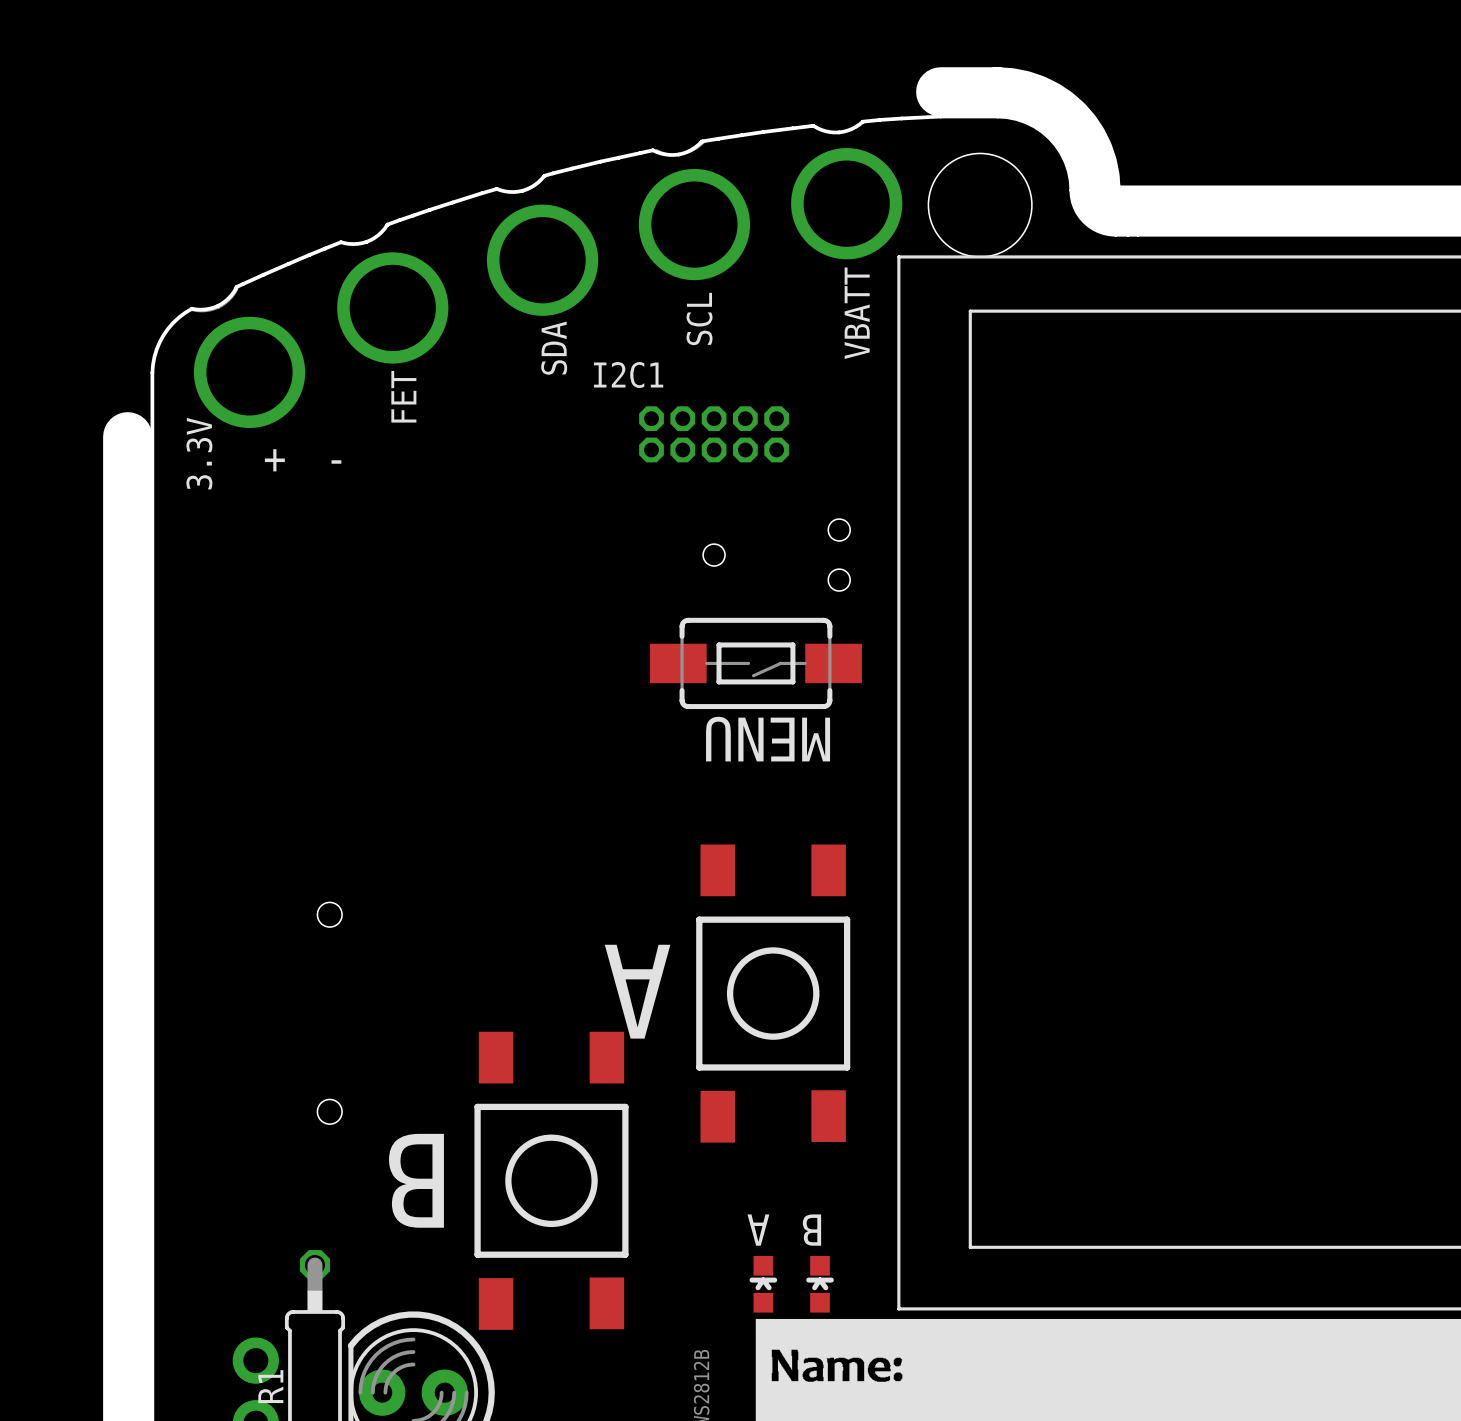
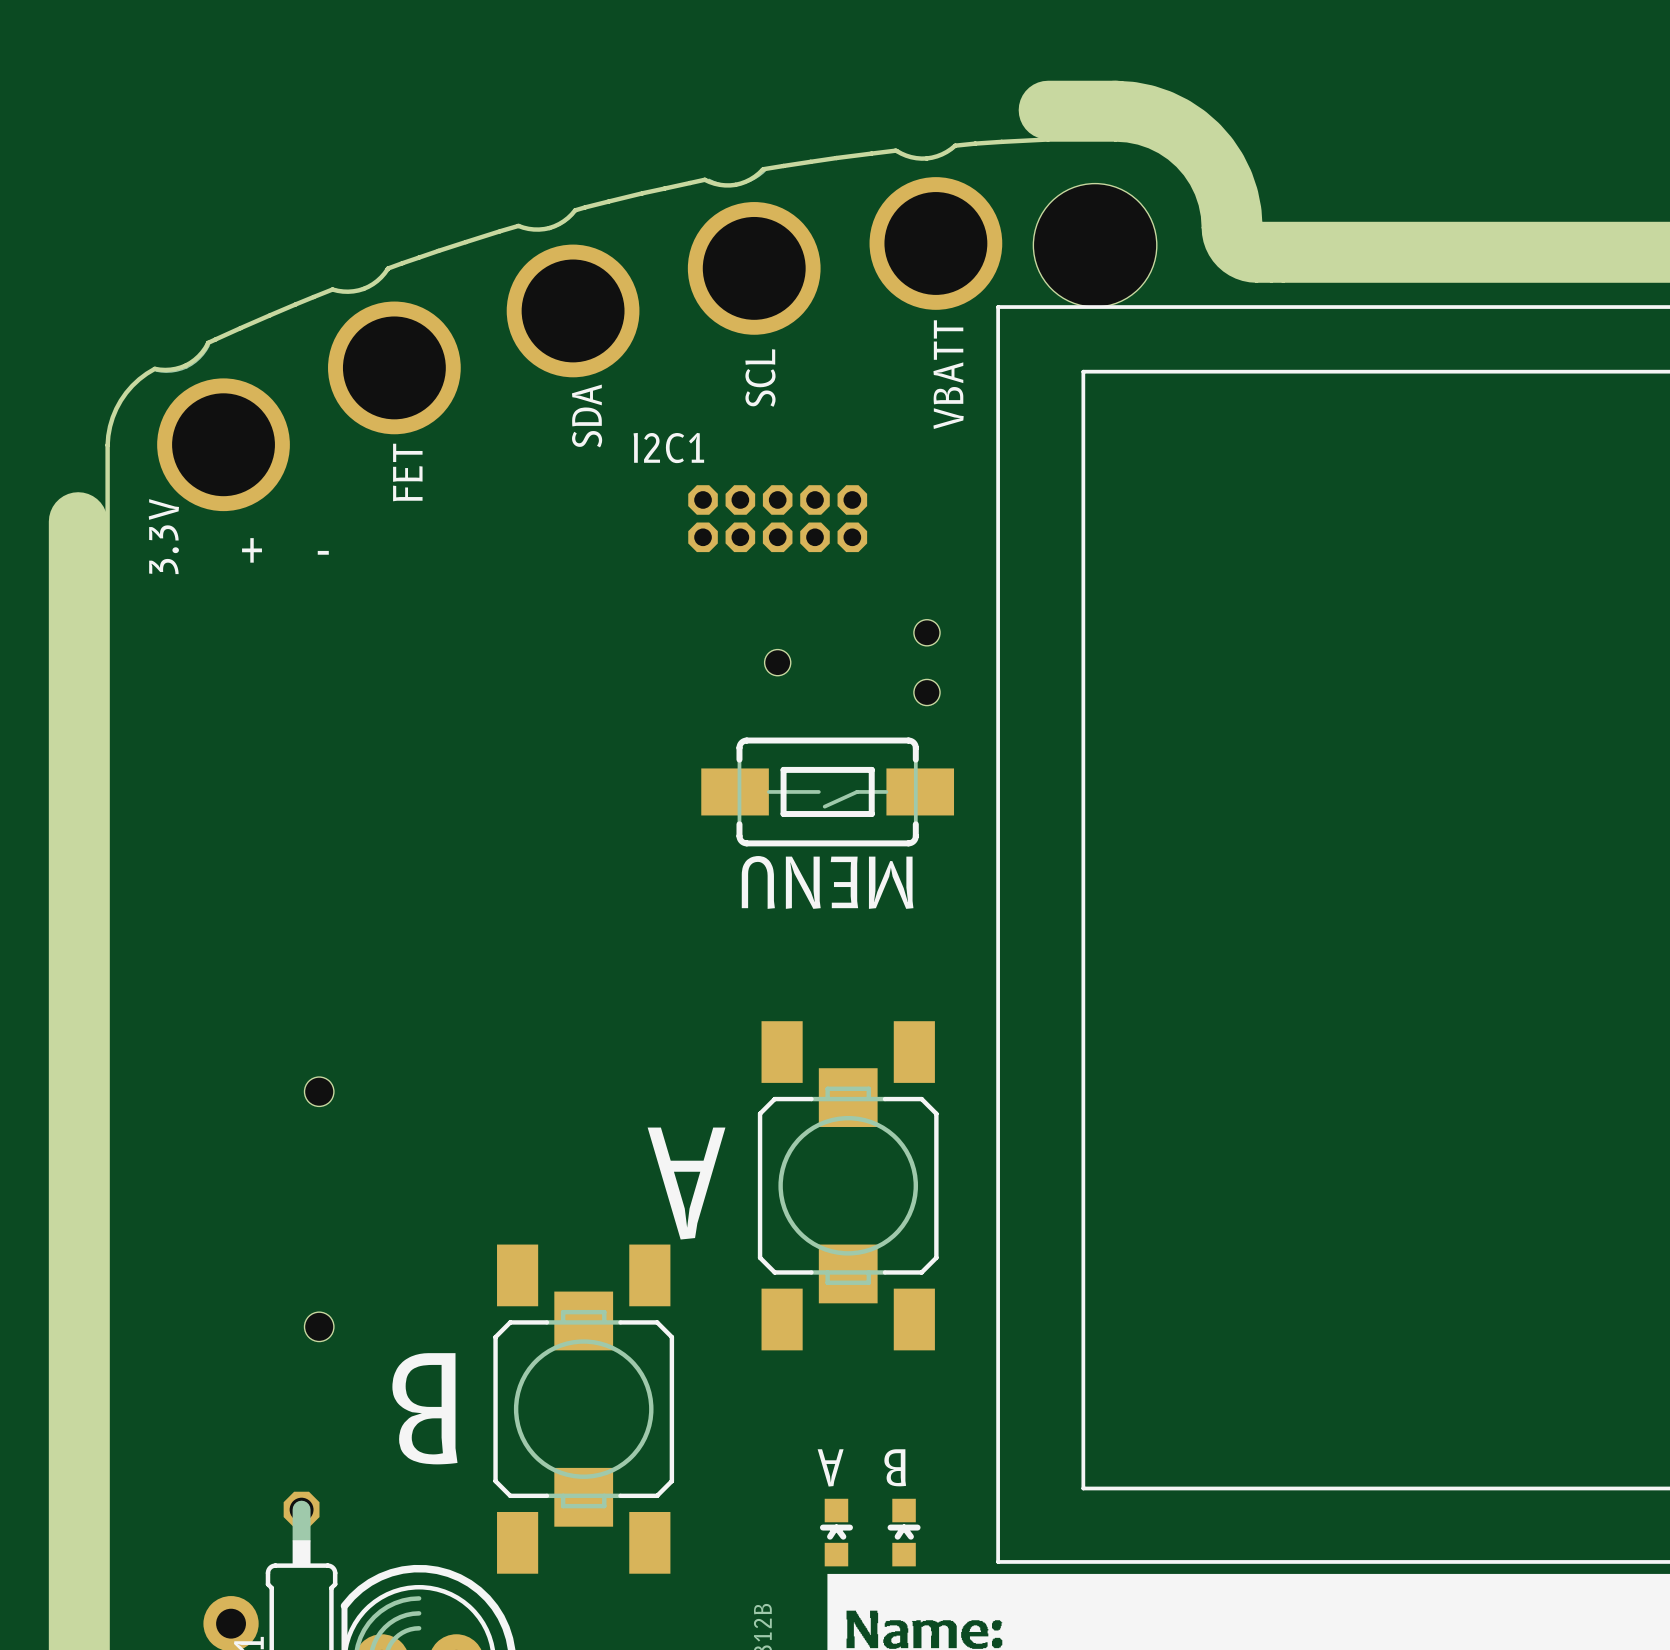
part footprint: [696, 844, 851, 1143] -> [757, 1021, 939, 1351]
part footprint: [474, 1031, 629, 1330] -> [493, 1244, 675, 1574]

